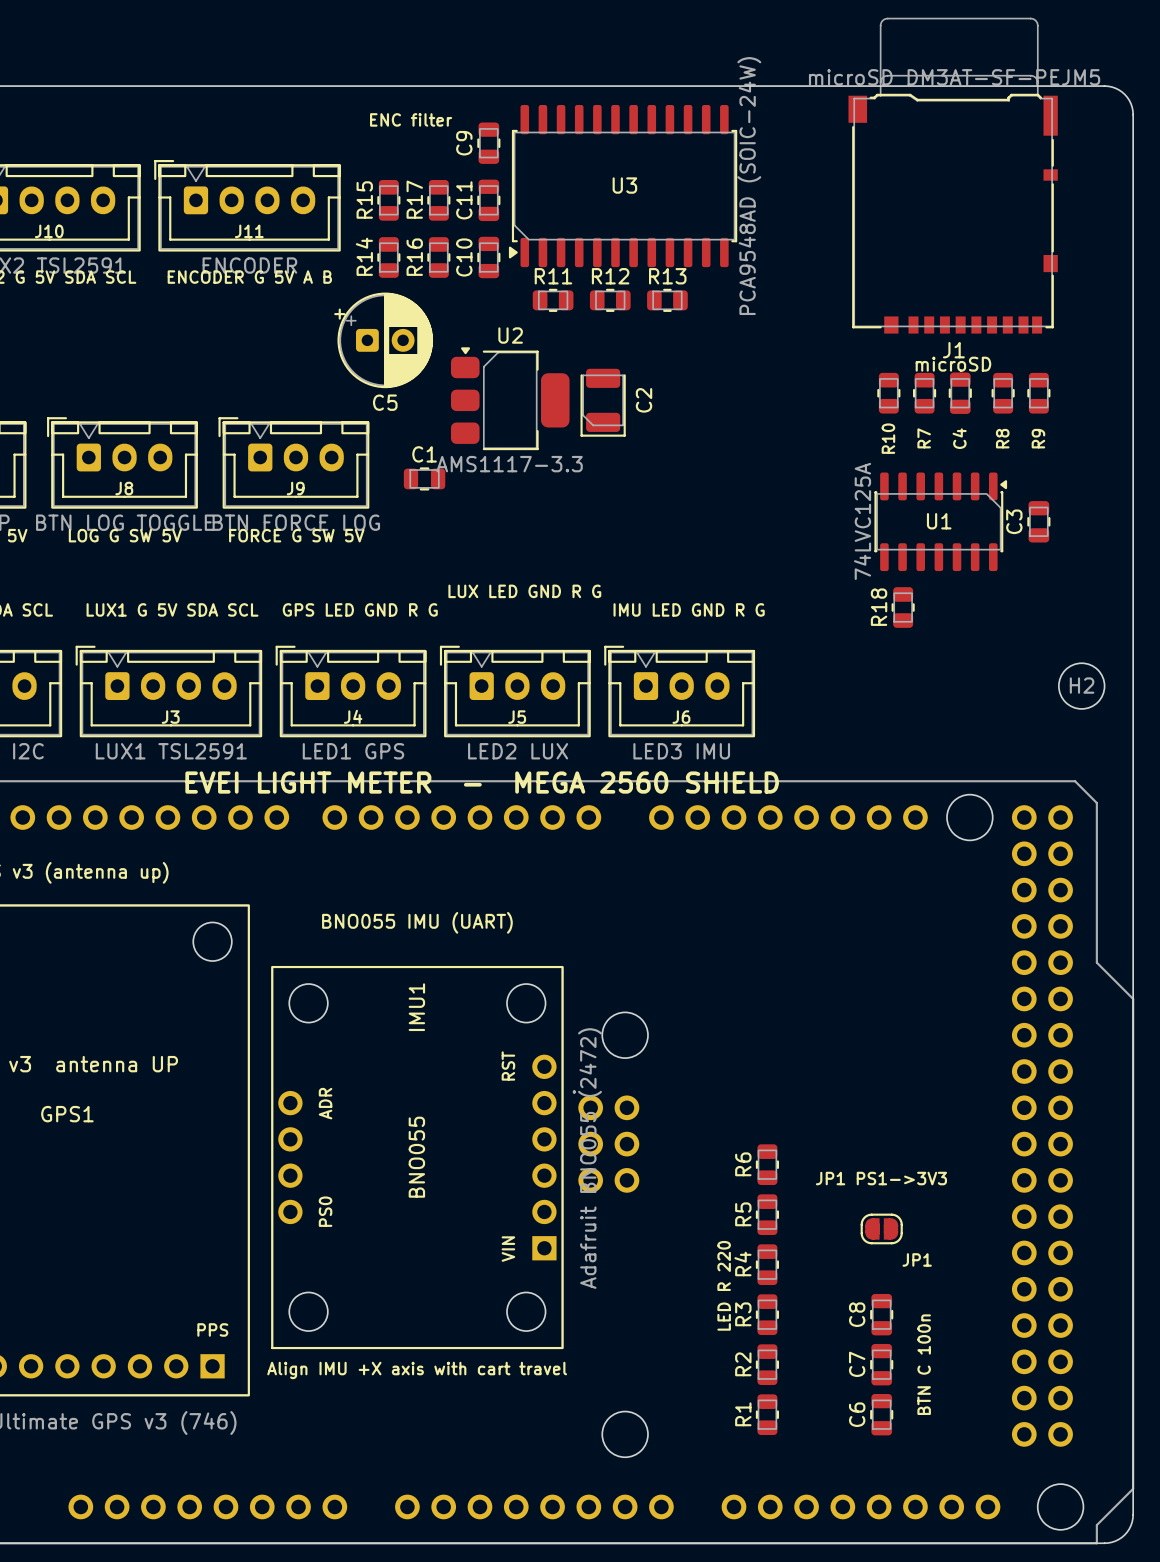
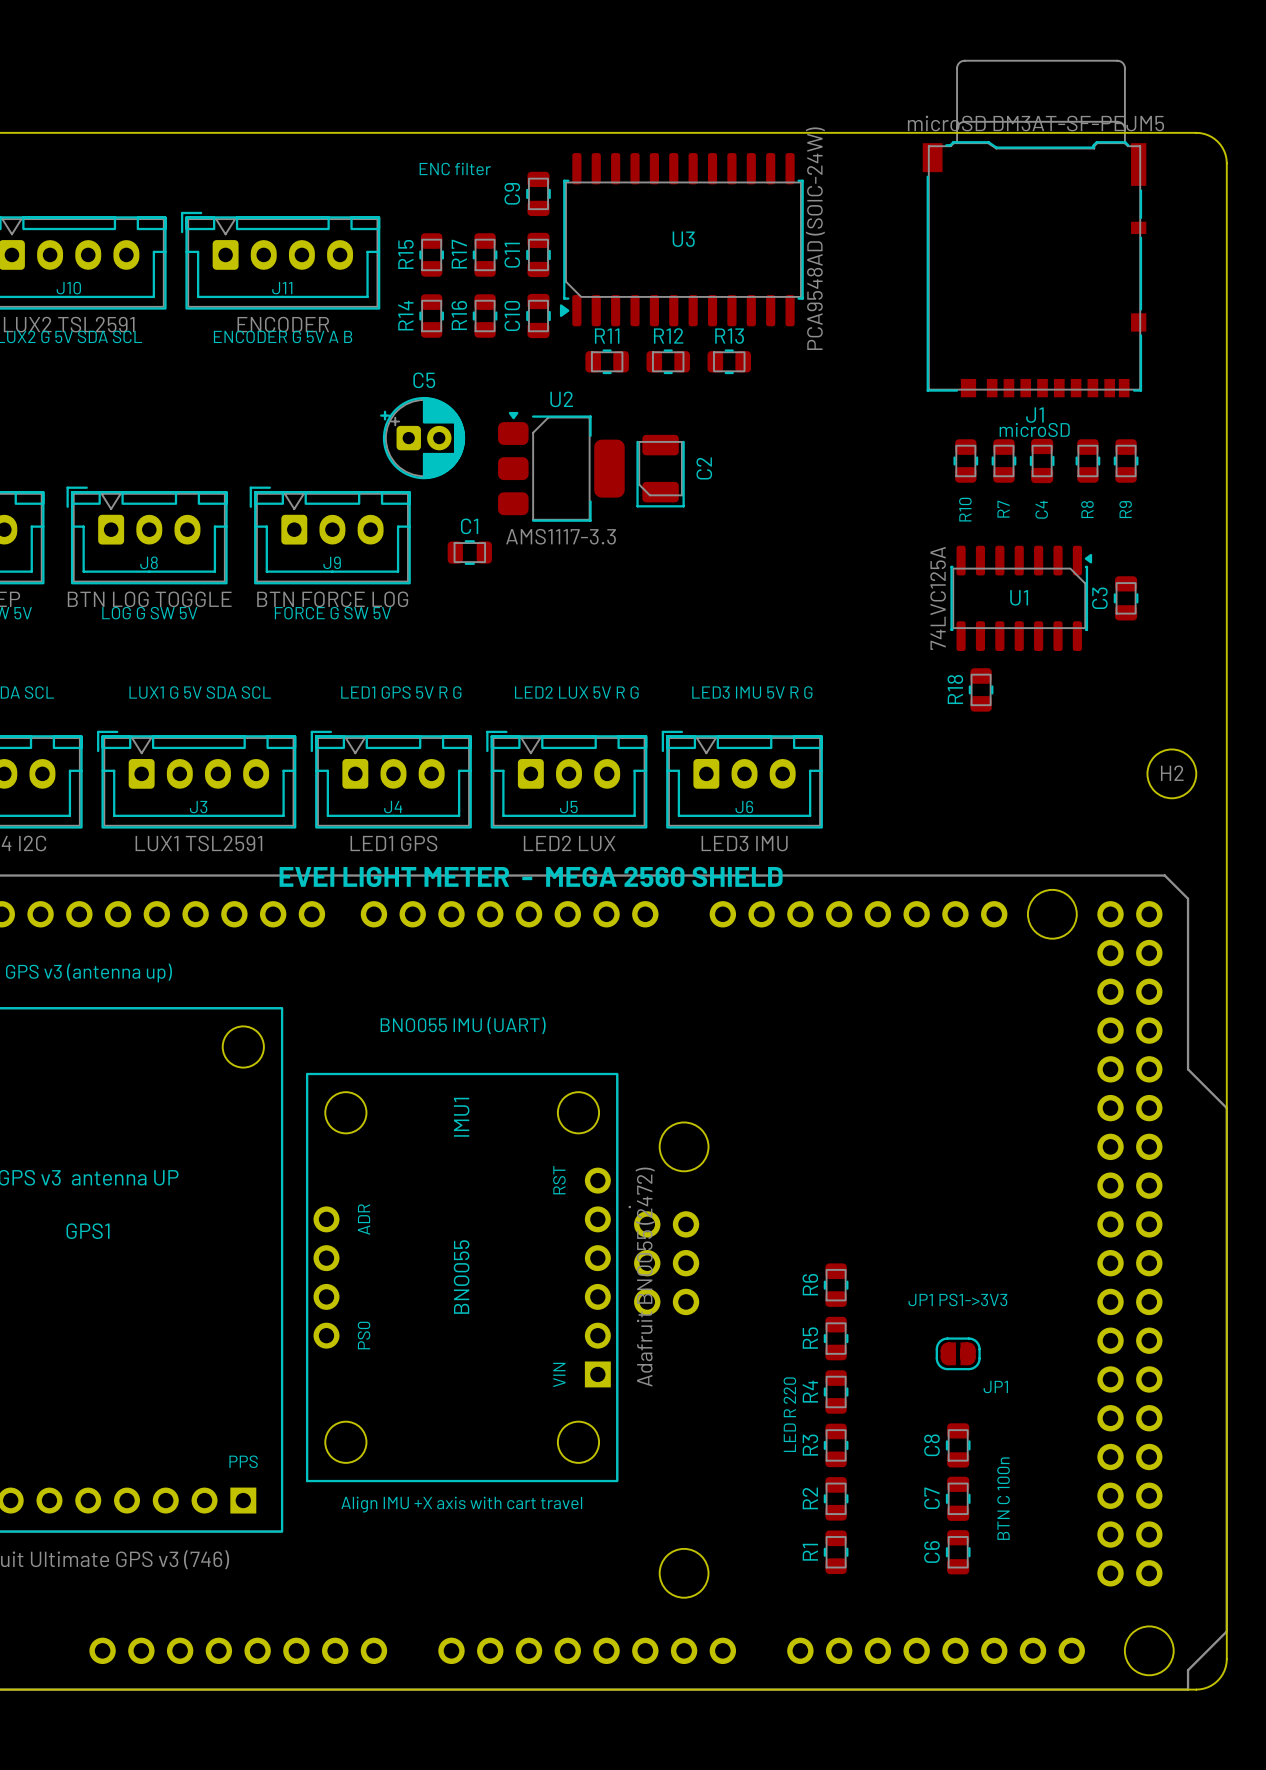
C5 footprint: [334, 292, 434, 389] -> [380, 396, 466, 480]
C5 name position: C5 (385, 402) -> C5 (424, 380)
text: LUX LED GND R G (524, 591) -> none
text: GPS LED GND R G (360, 609) -> LED1 GPS 5V R G (401, 692)
text: none -> LED2 LUX 5V R G (576, 692)
text: IMU LED GND R G (689, 609) -> LED3 IMU 5V R G (752, 692)

